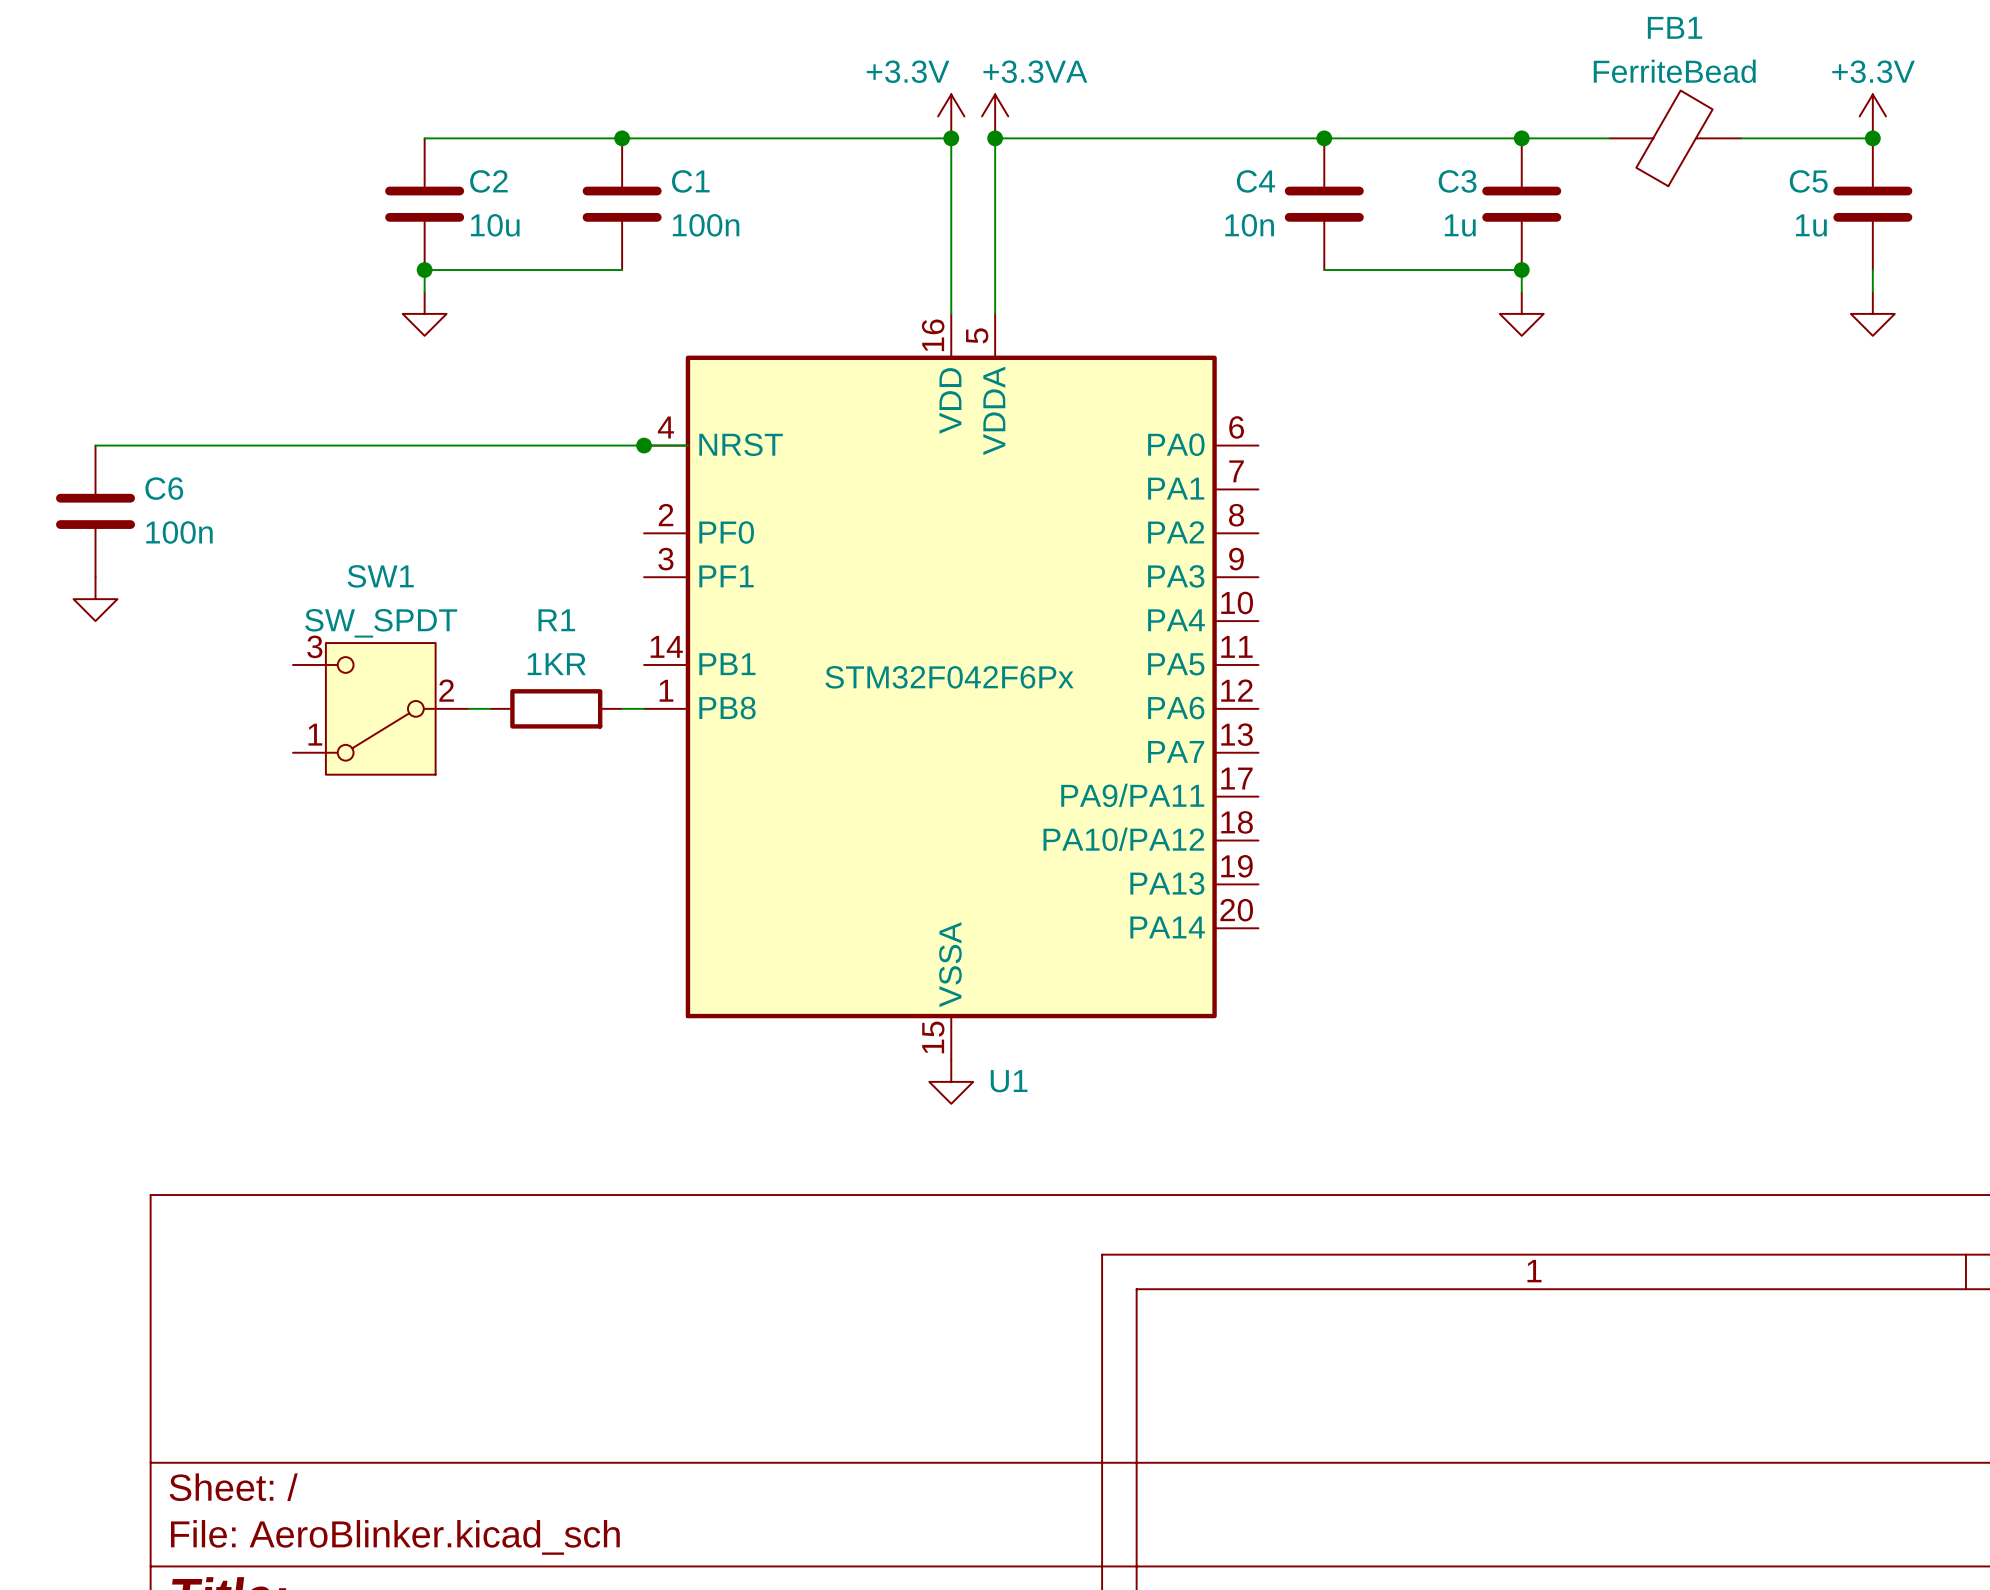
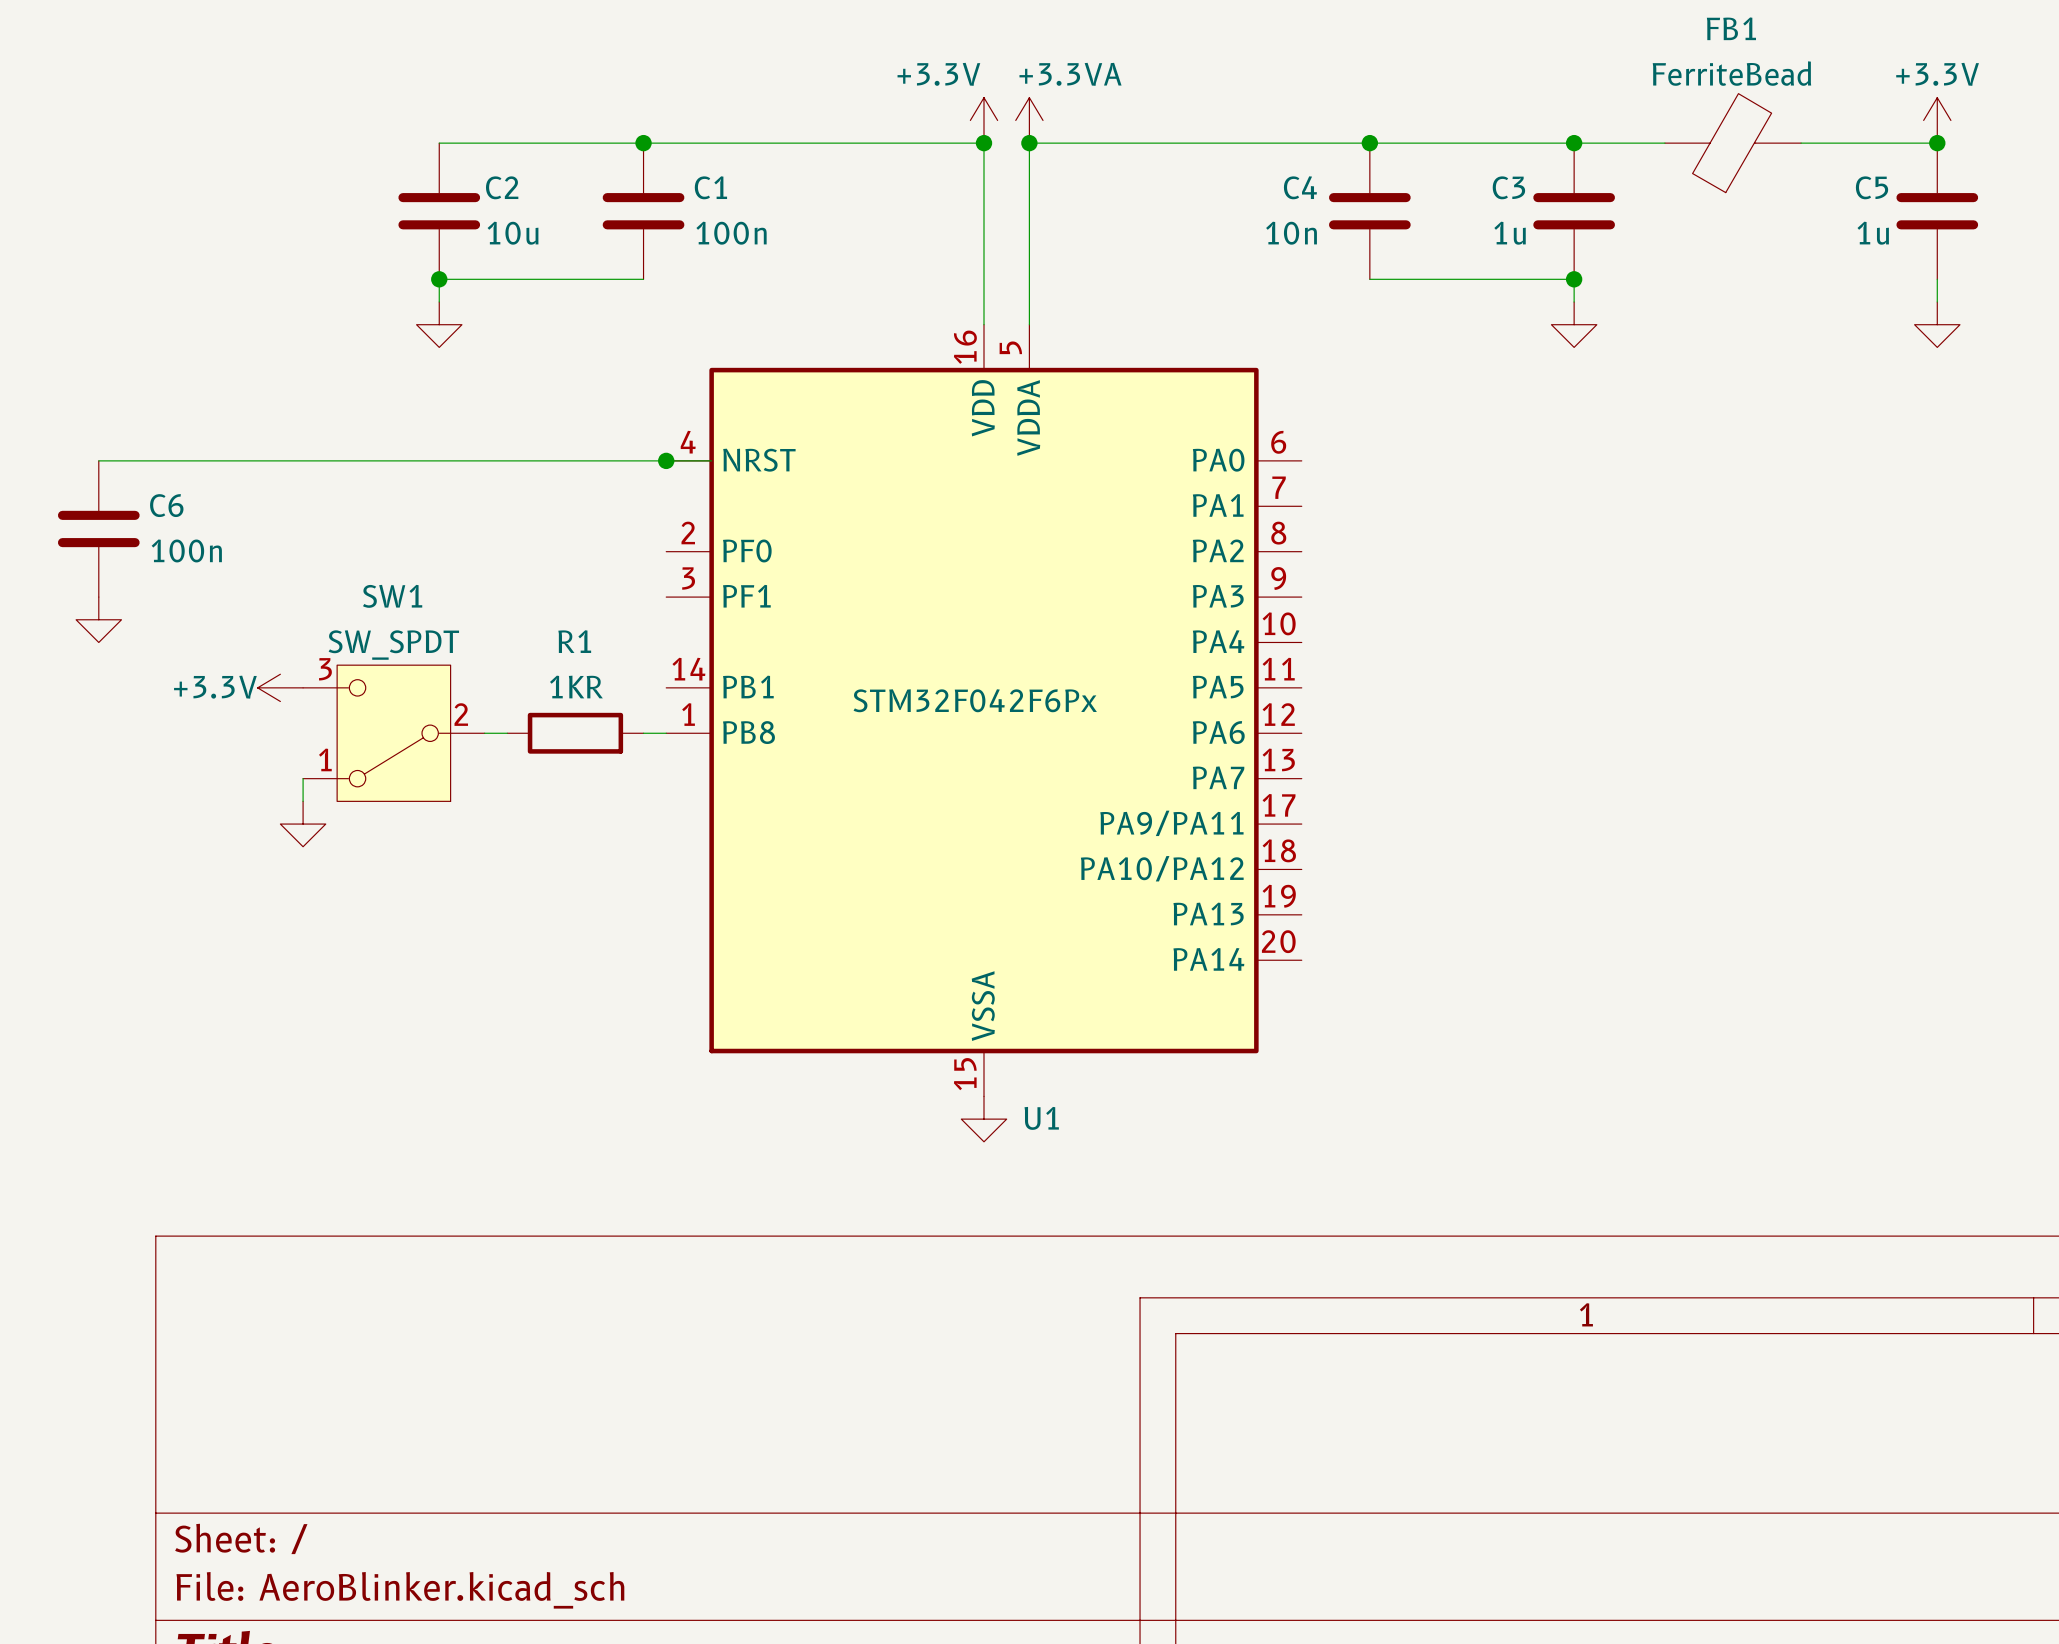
power symbol: none -> +3.3V (280, 687)
wire: none -> (303, 778) (303, 801)
power symbol: none -> (303, 824)

